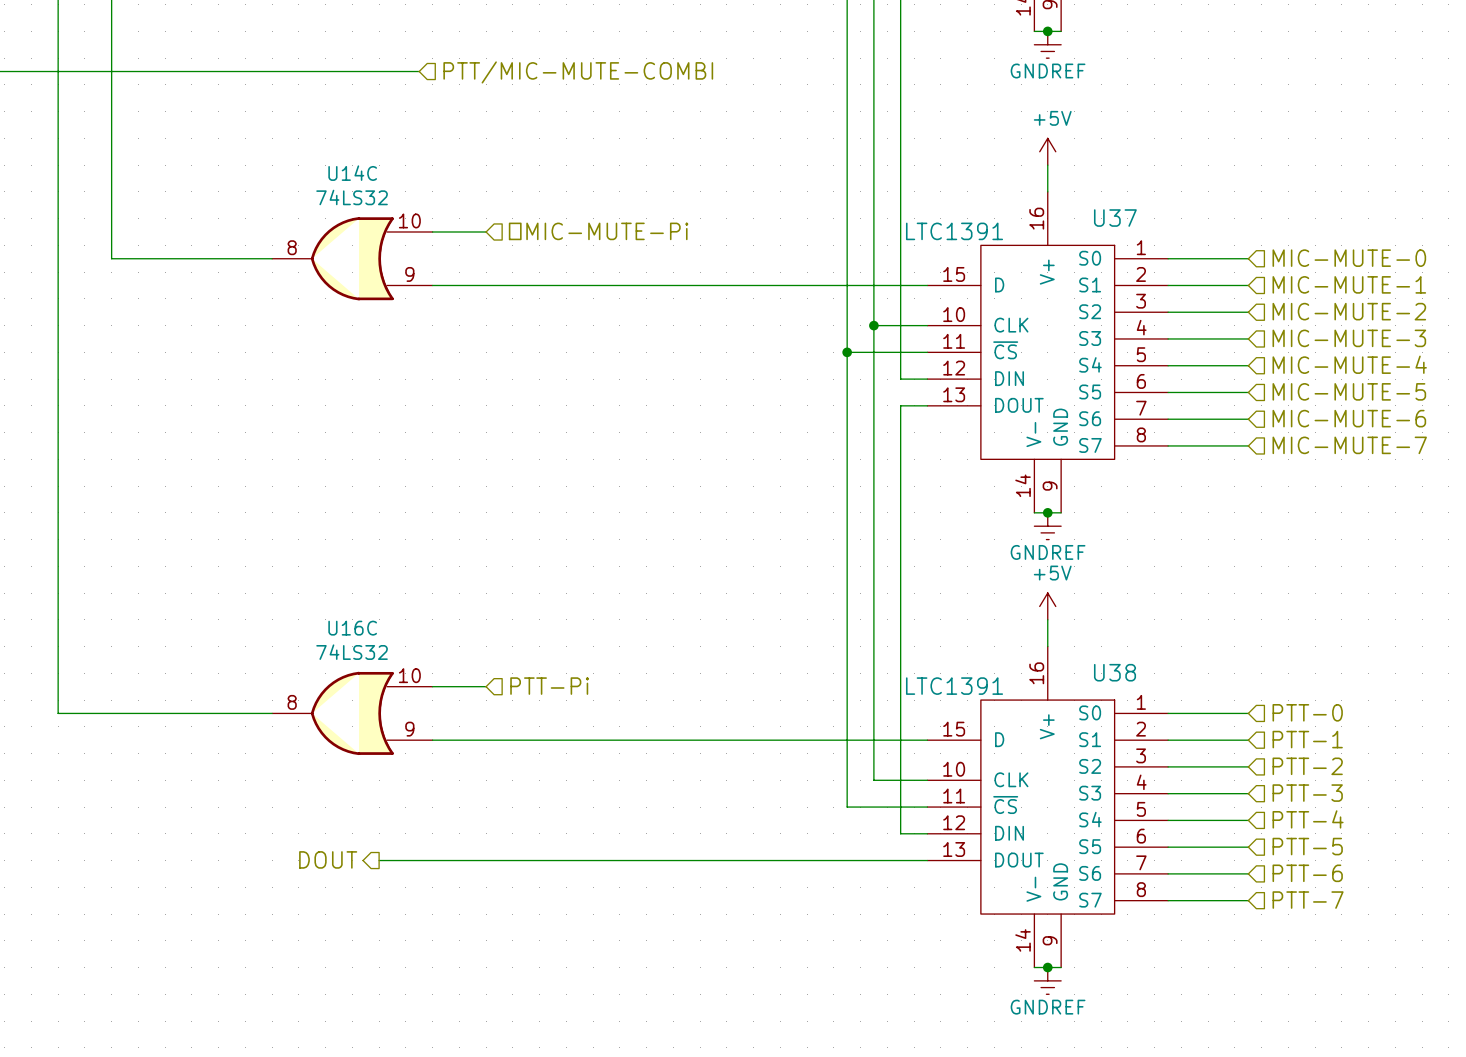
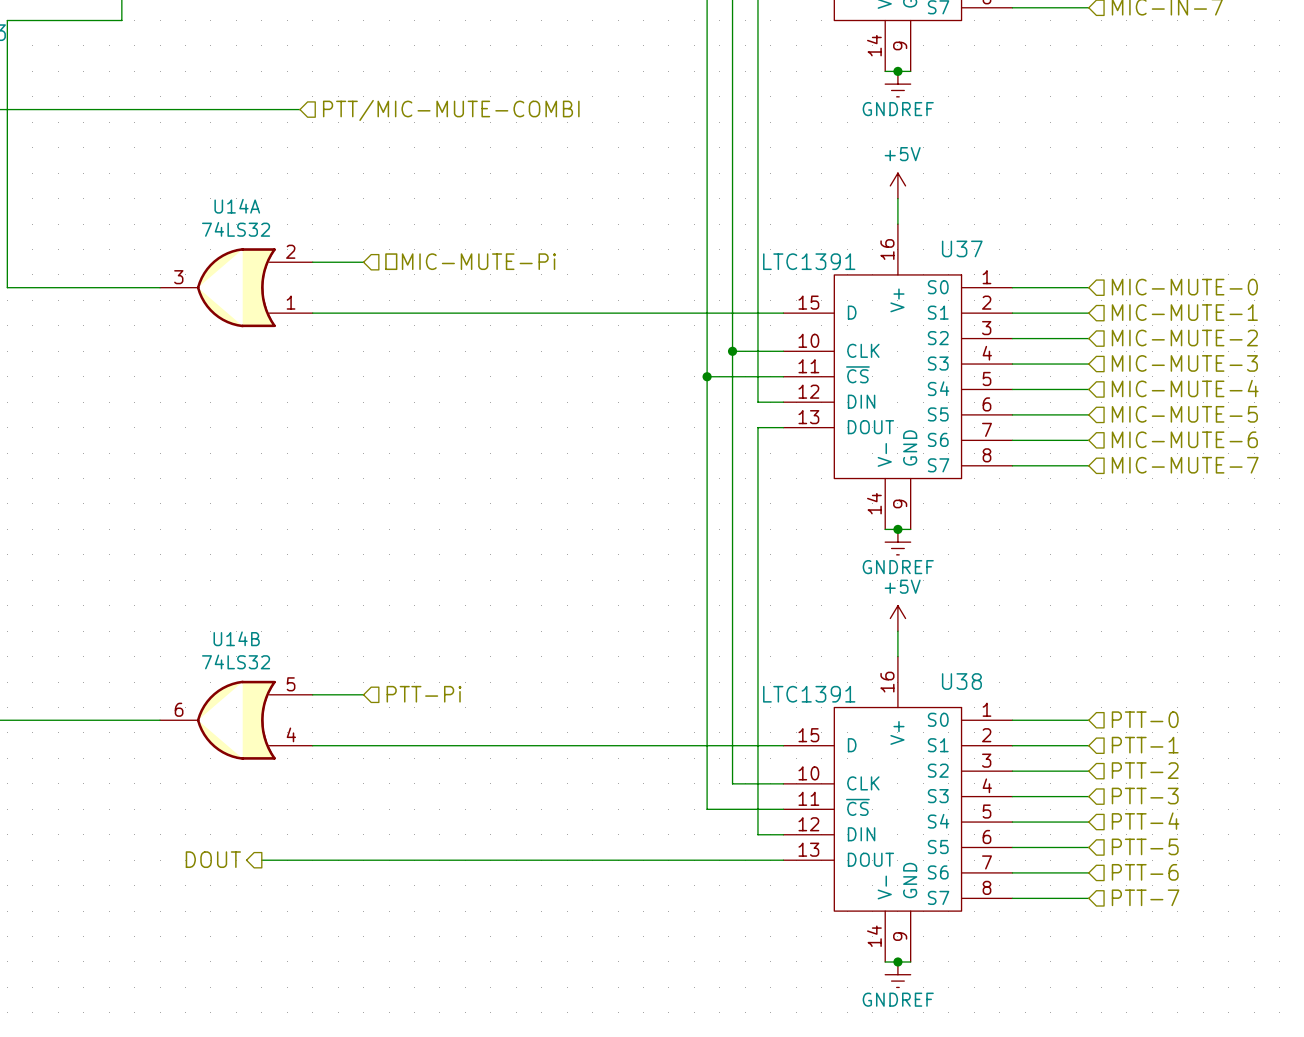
U14C name: U14C (352, 173) -> U14A (237, 206)
U14C pin number: 10 (409, 220) -> 2 (290, 251)
U14C pin number: 8 (292, 247) -> 3 (178, 277)
U14C pin number: 9 (409, 274) -> 1 (291, 302)
U16C name: U16C (352, 628) -> U14B (236, 638)
U16C pin number: 10 (409, 675) -> 5 (291, 684)
U16C pin number: 8 (292, 702) -> 6 (179, 709)
U16C pin number: 9 (409, 729) -> 4 (291, 734)

